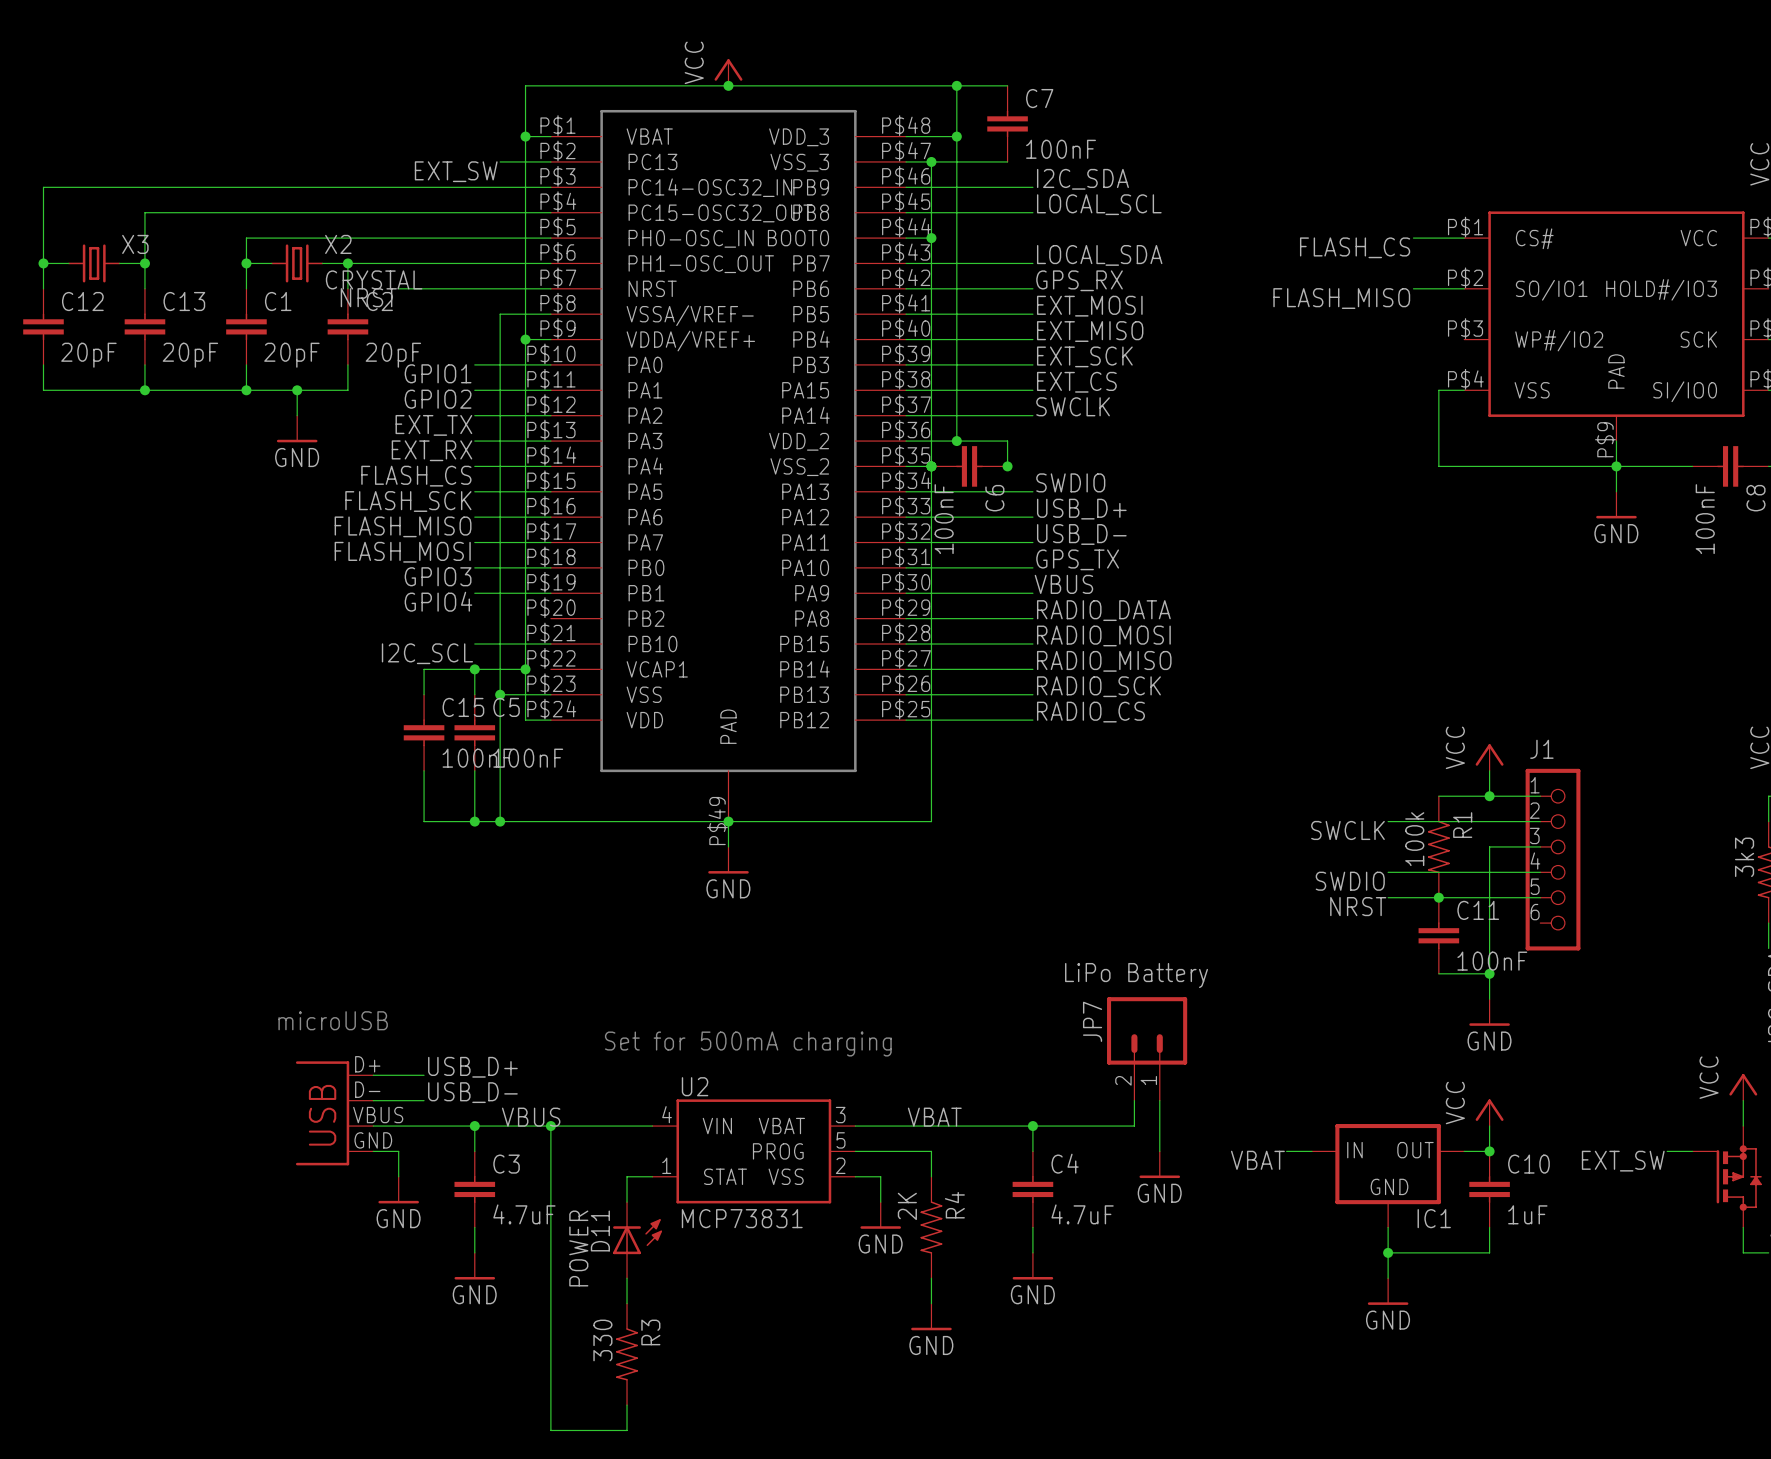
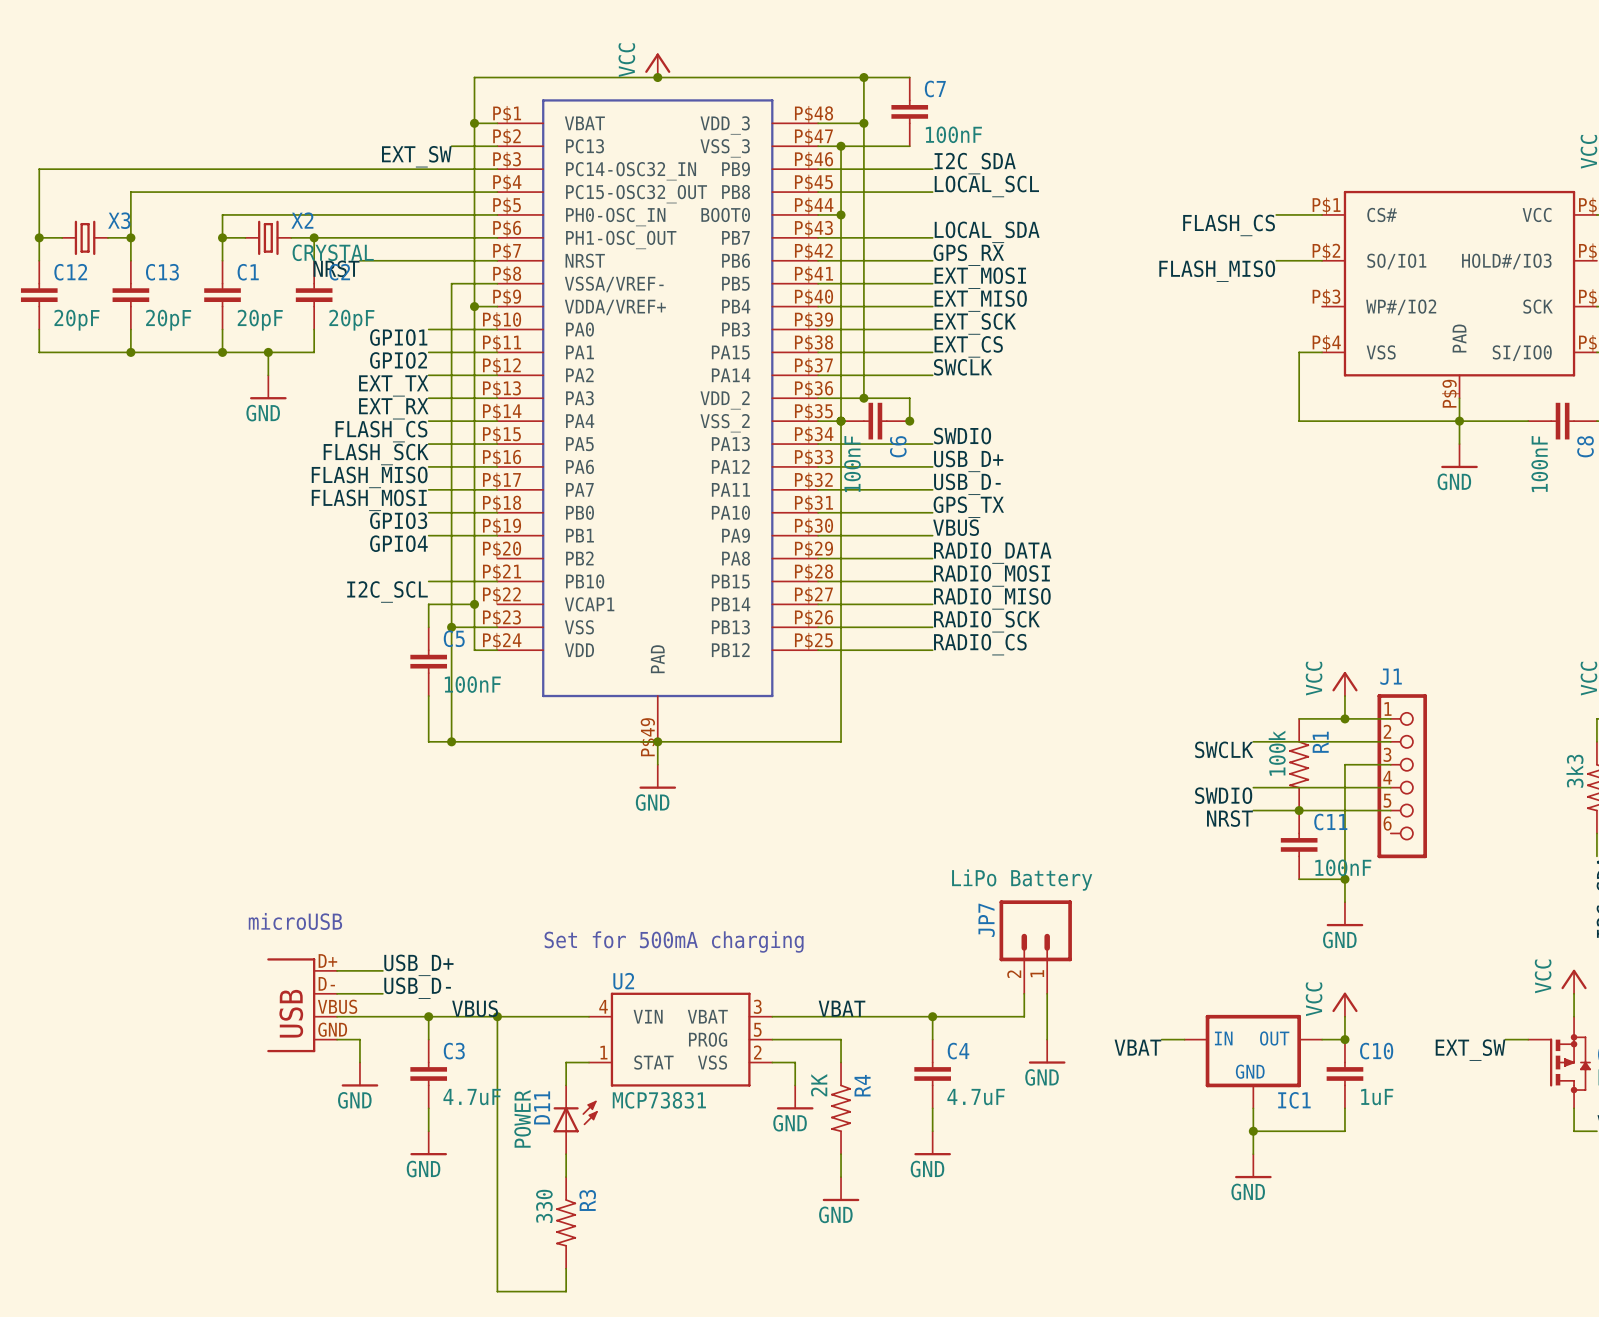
wire: (474, 669) (424, 669) (424, 694) -> none
junction: (474, 669) -> none
C15: 100nF (424, 732) -> none
wire: (424, 770) (424, 821) (474, 821) -> none
junction: (474, 821) -> none

